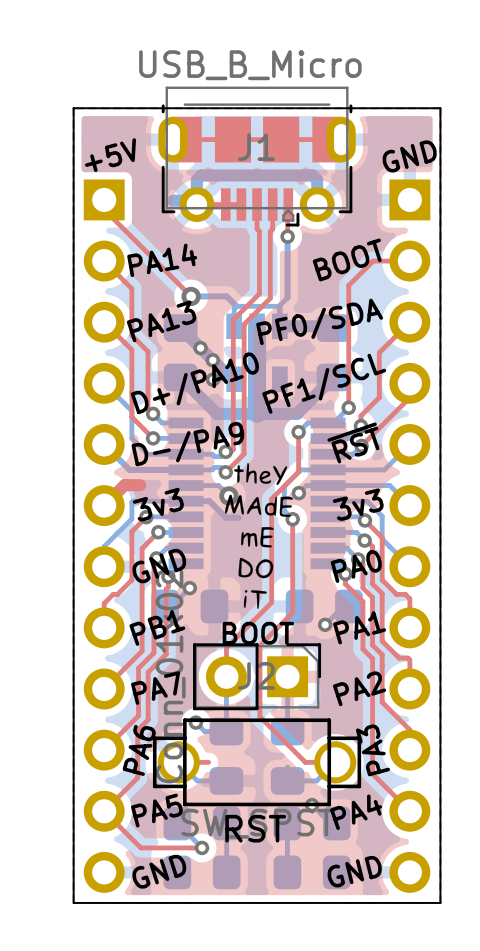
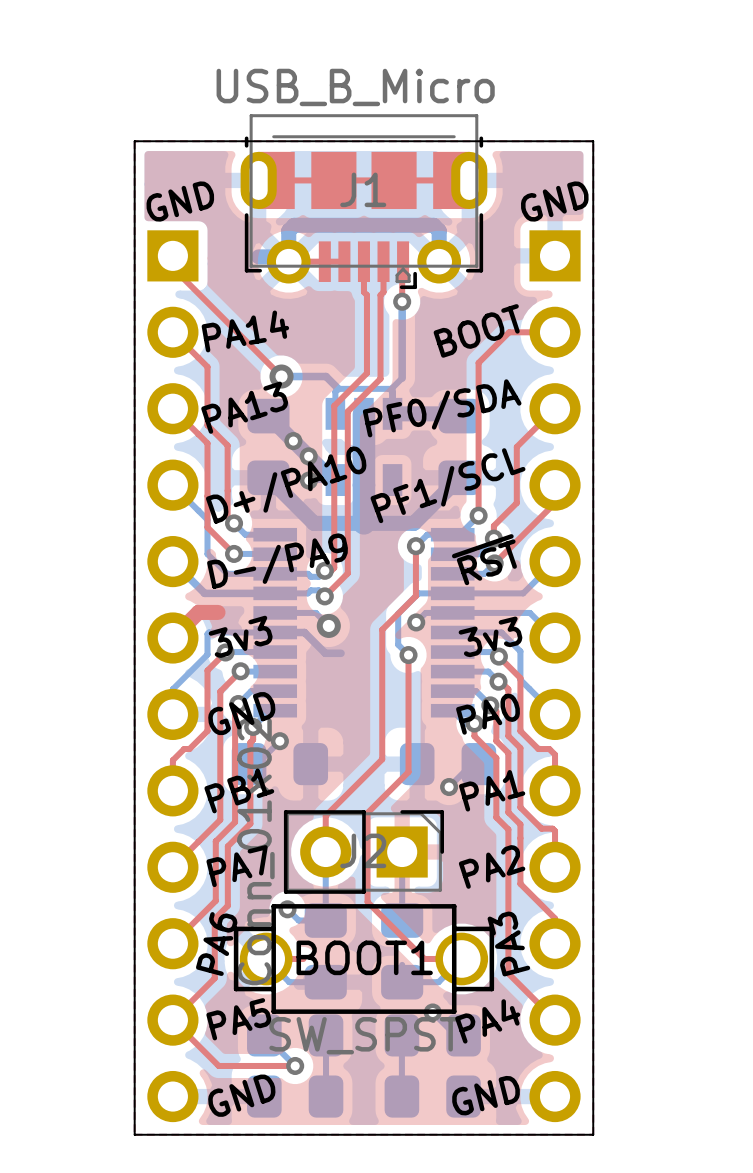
text: +5V (110, 155) -> GND (180, 201)
drawing: [225, 463, 293, 609] -> none
text: BOOT (258, 633) -> none
RST name: RST (255, 828) -> BOOT1 (364, 957)

